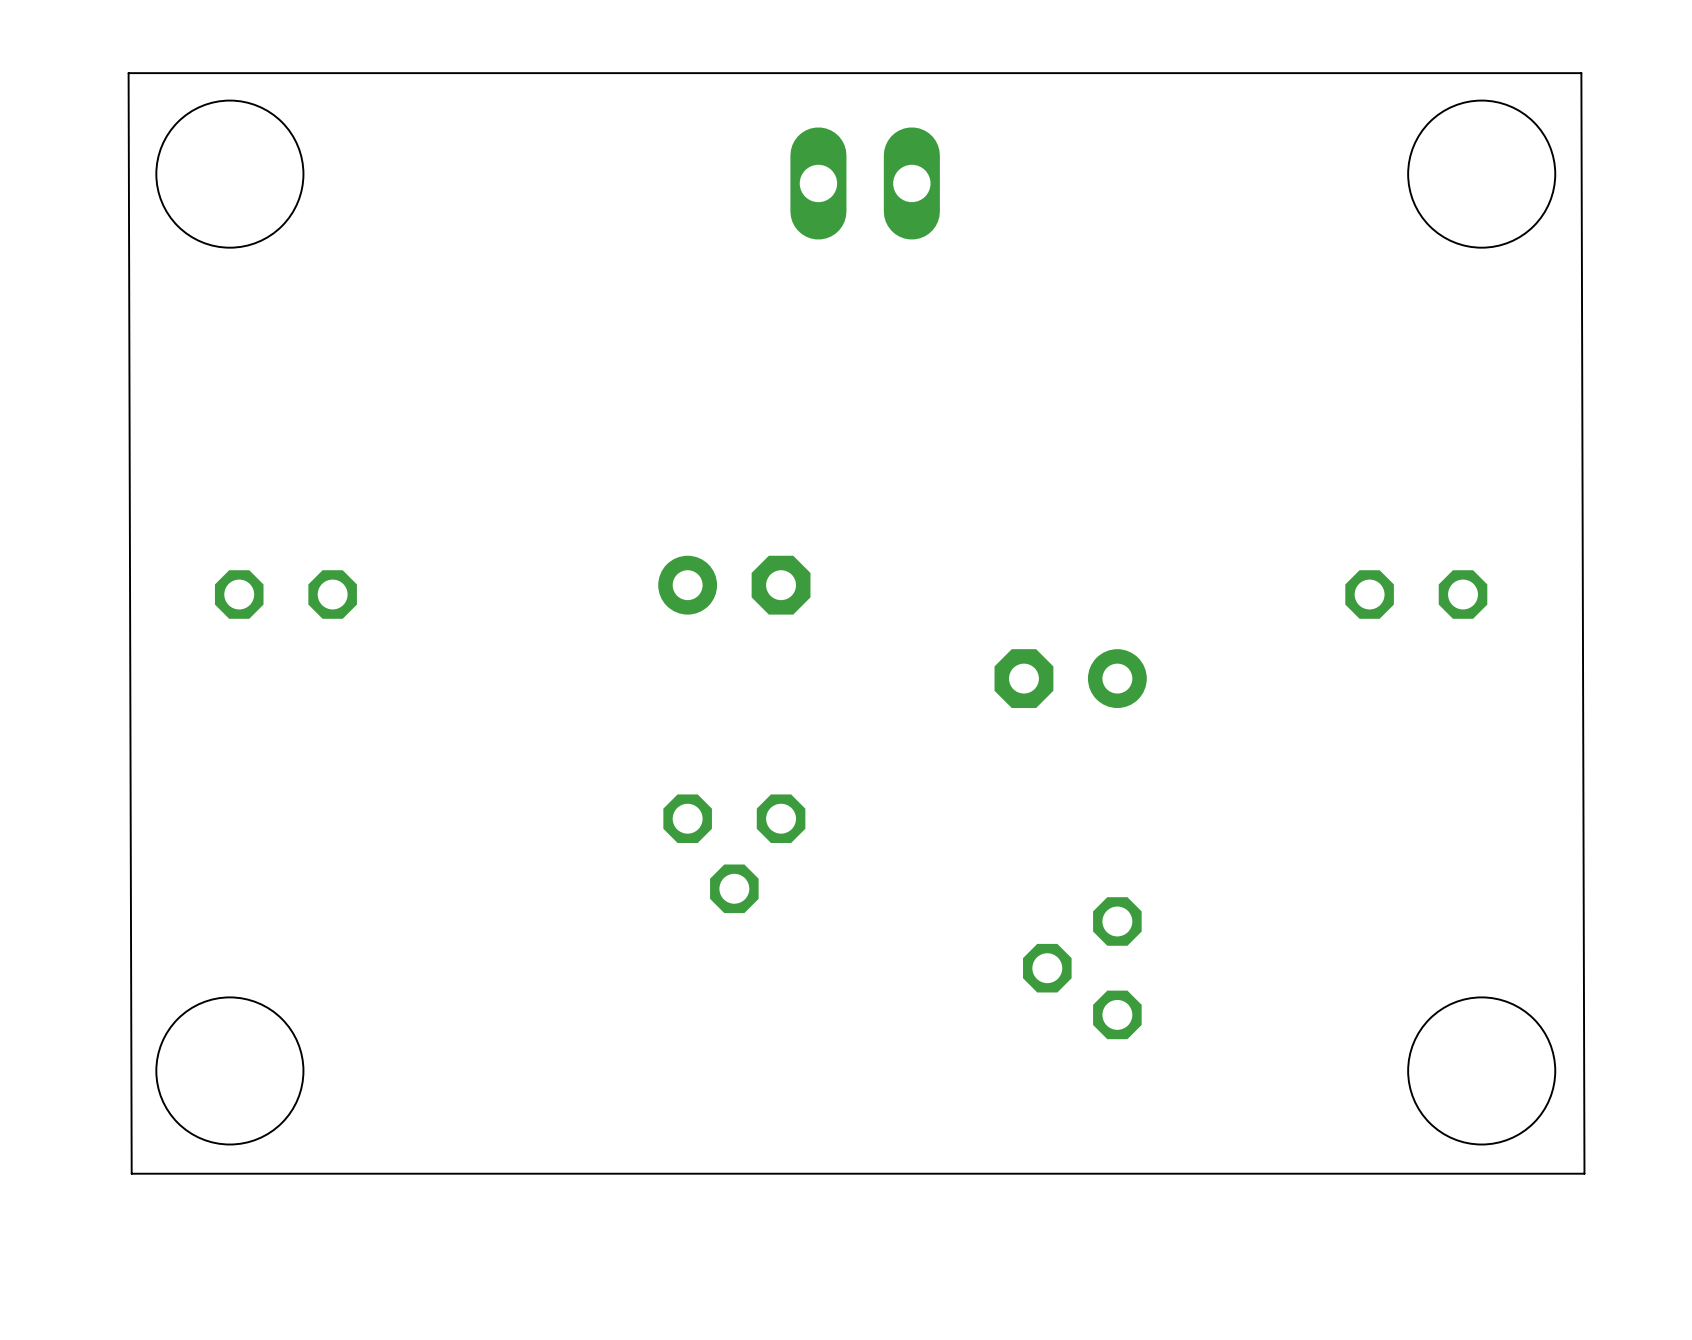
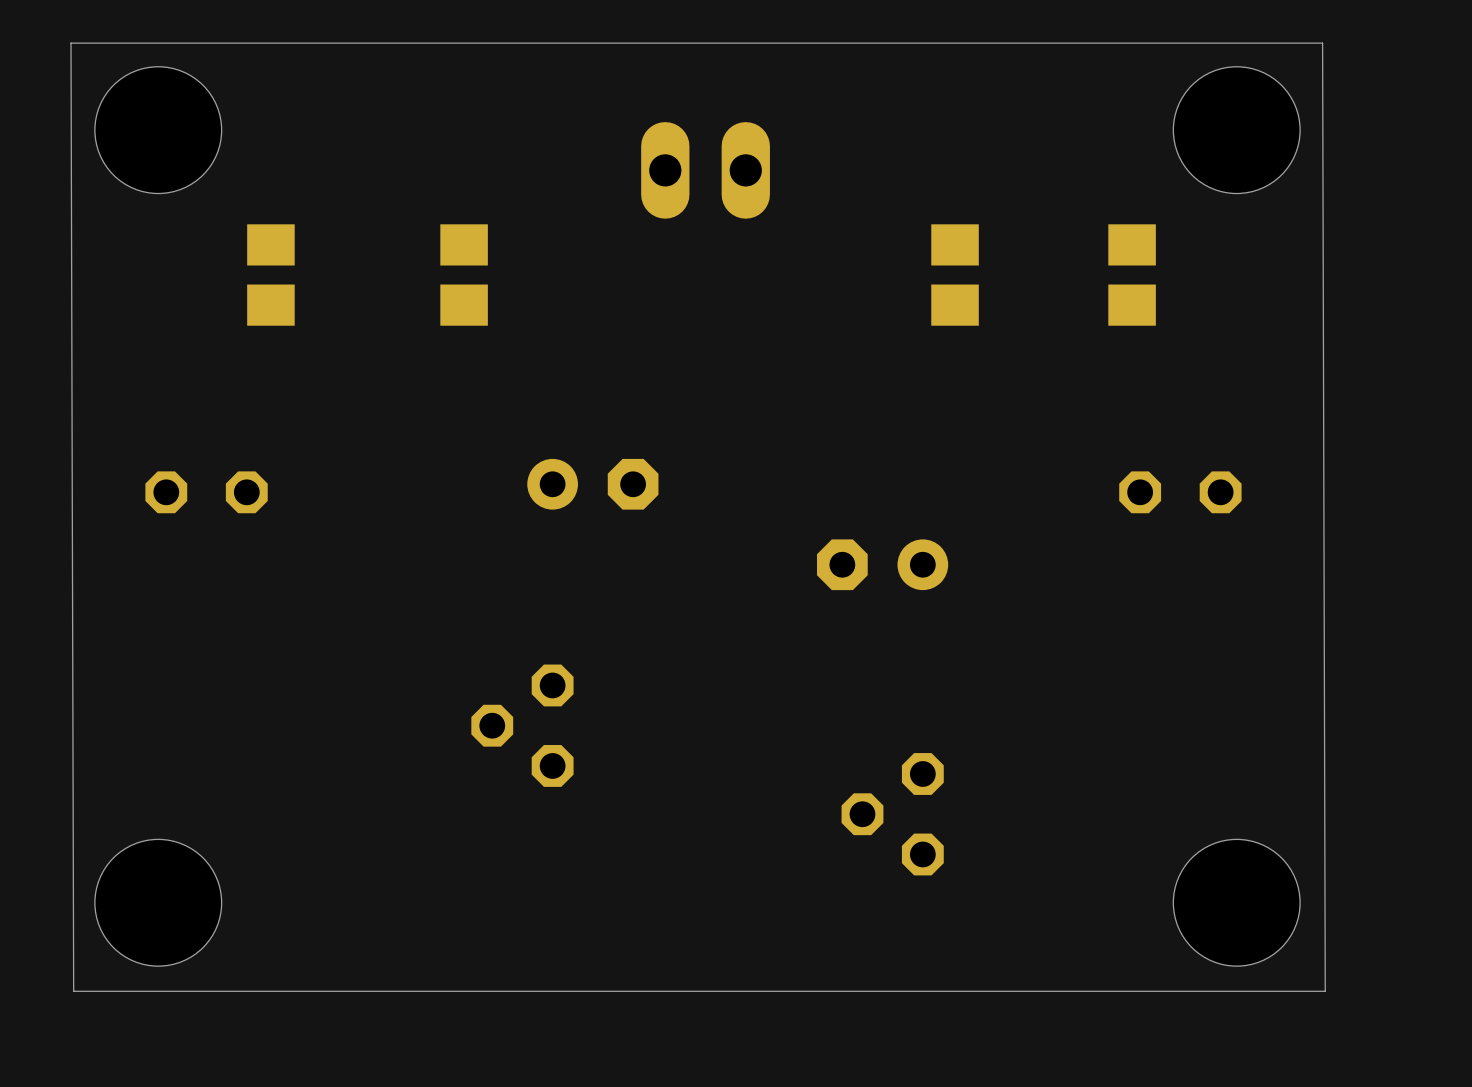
part position: (865, 183) -> (705, 170)
part: none -> (270, 275)
part: none -> (464, 275)
part: none -> (955, 275)
part: none -> (1132, 275)
part rotation: 0° (734, 853) -> 90° clockwise (522, 725)

